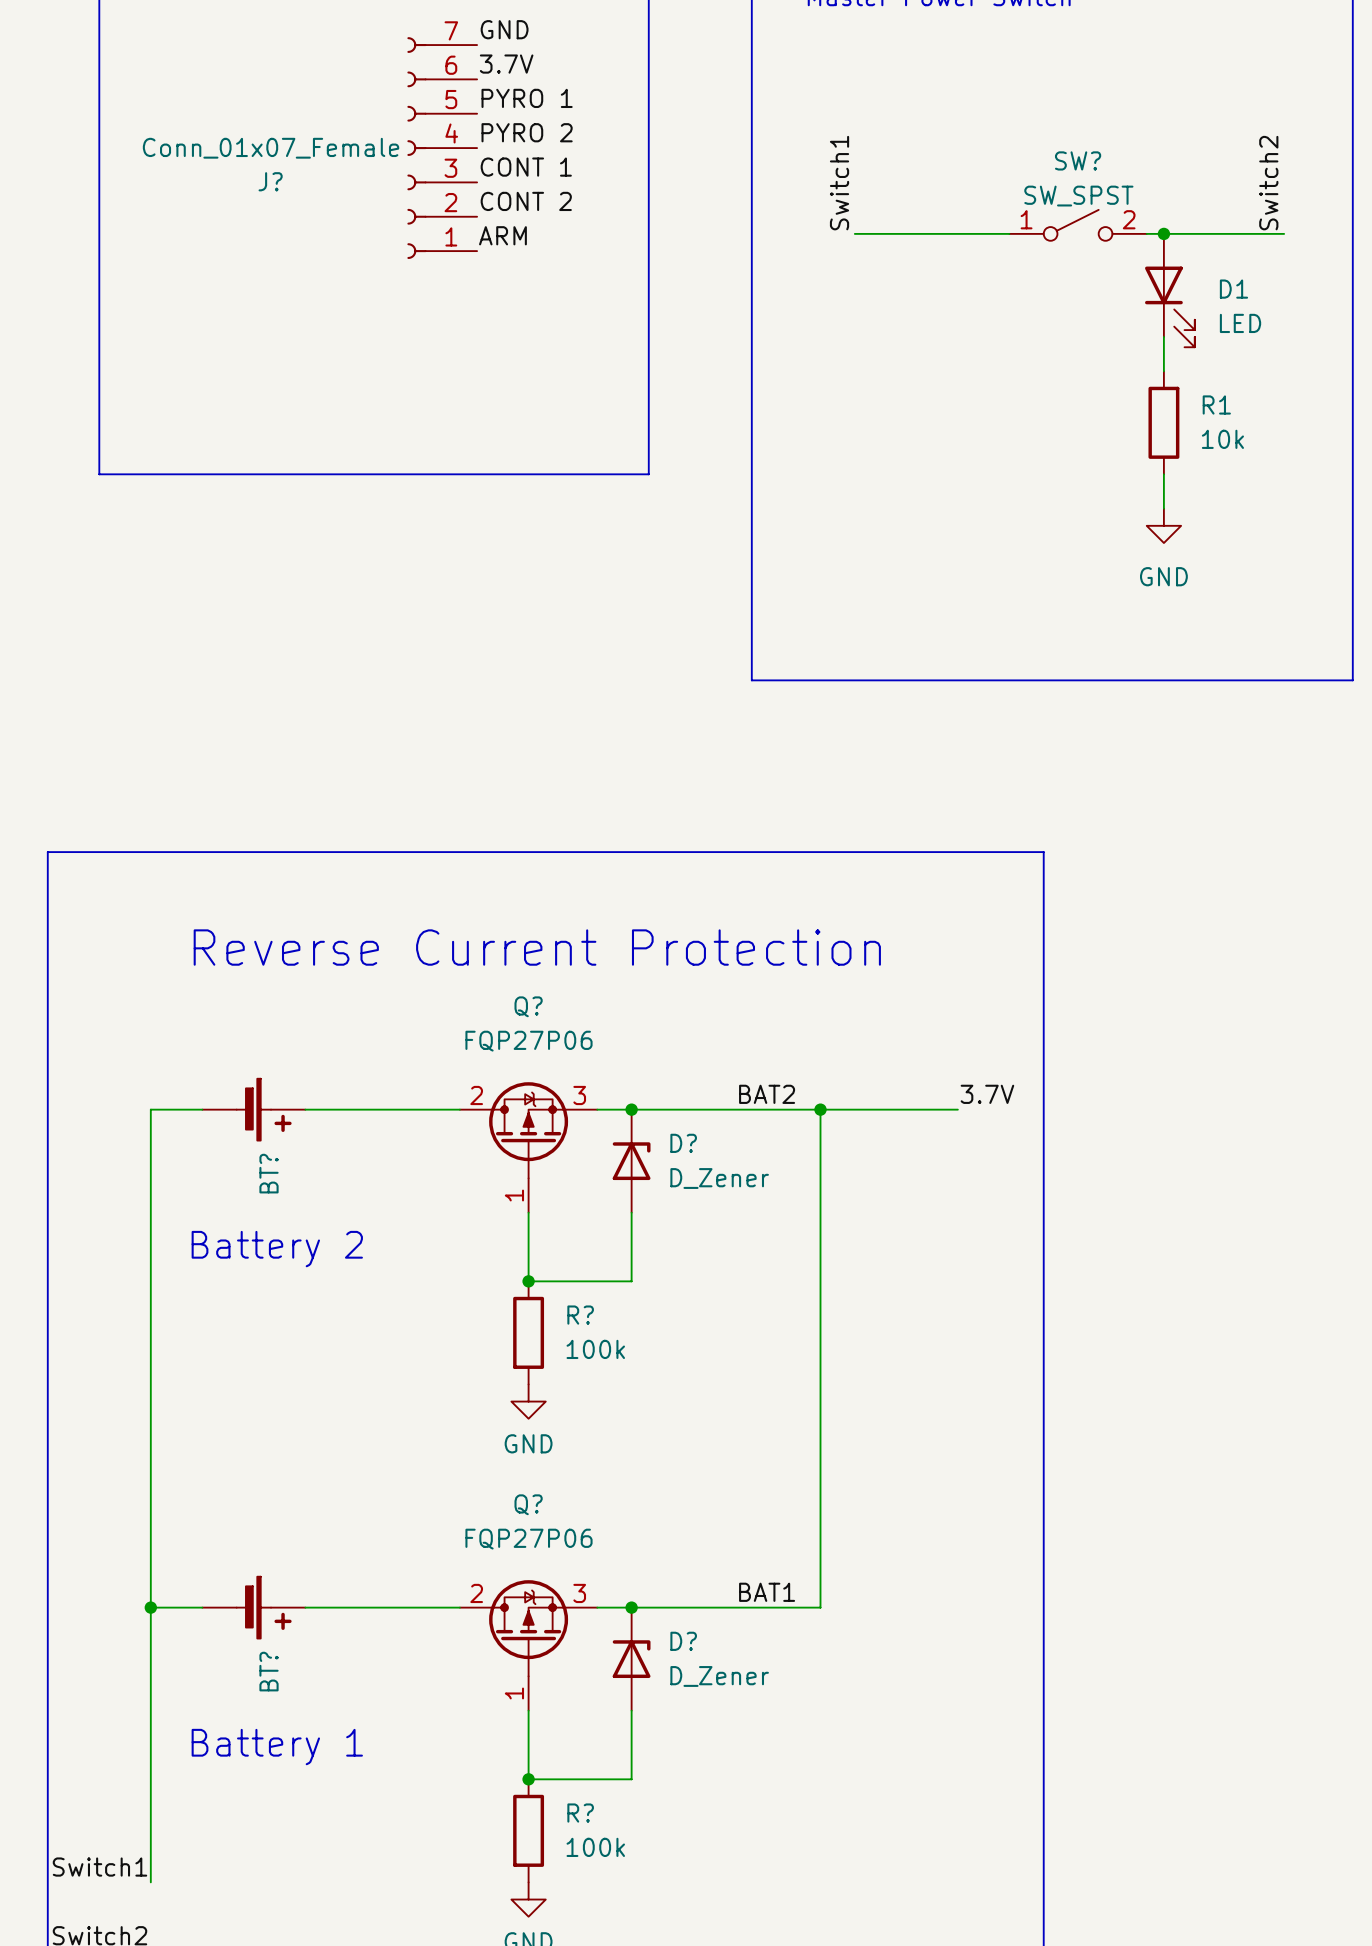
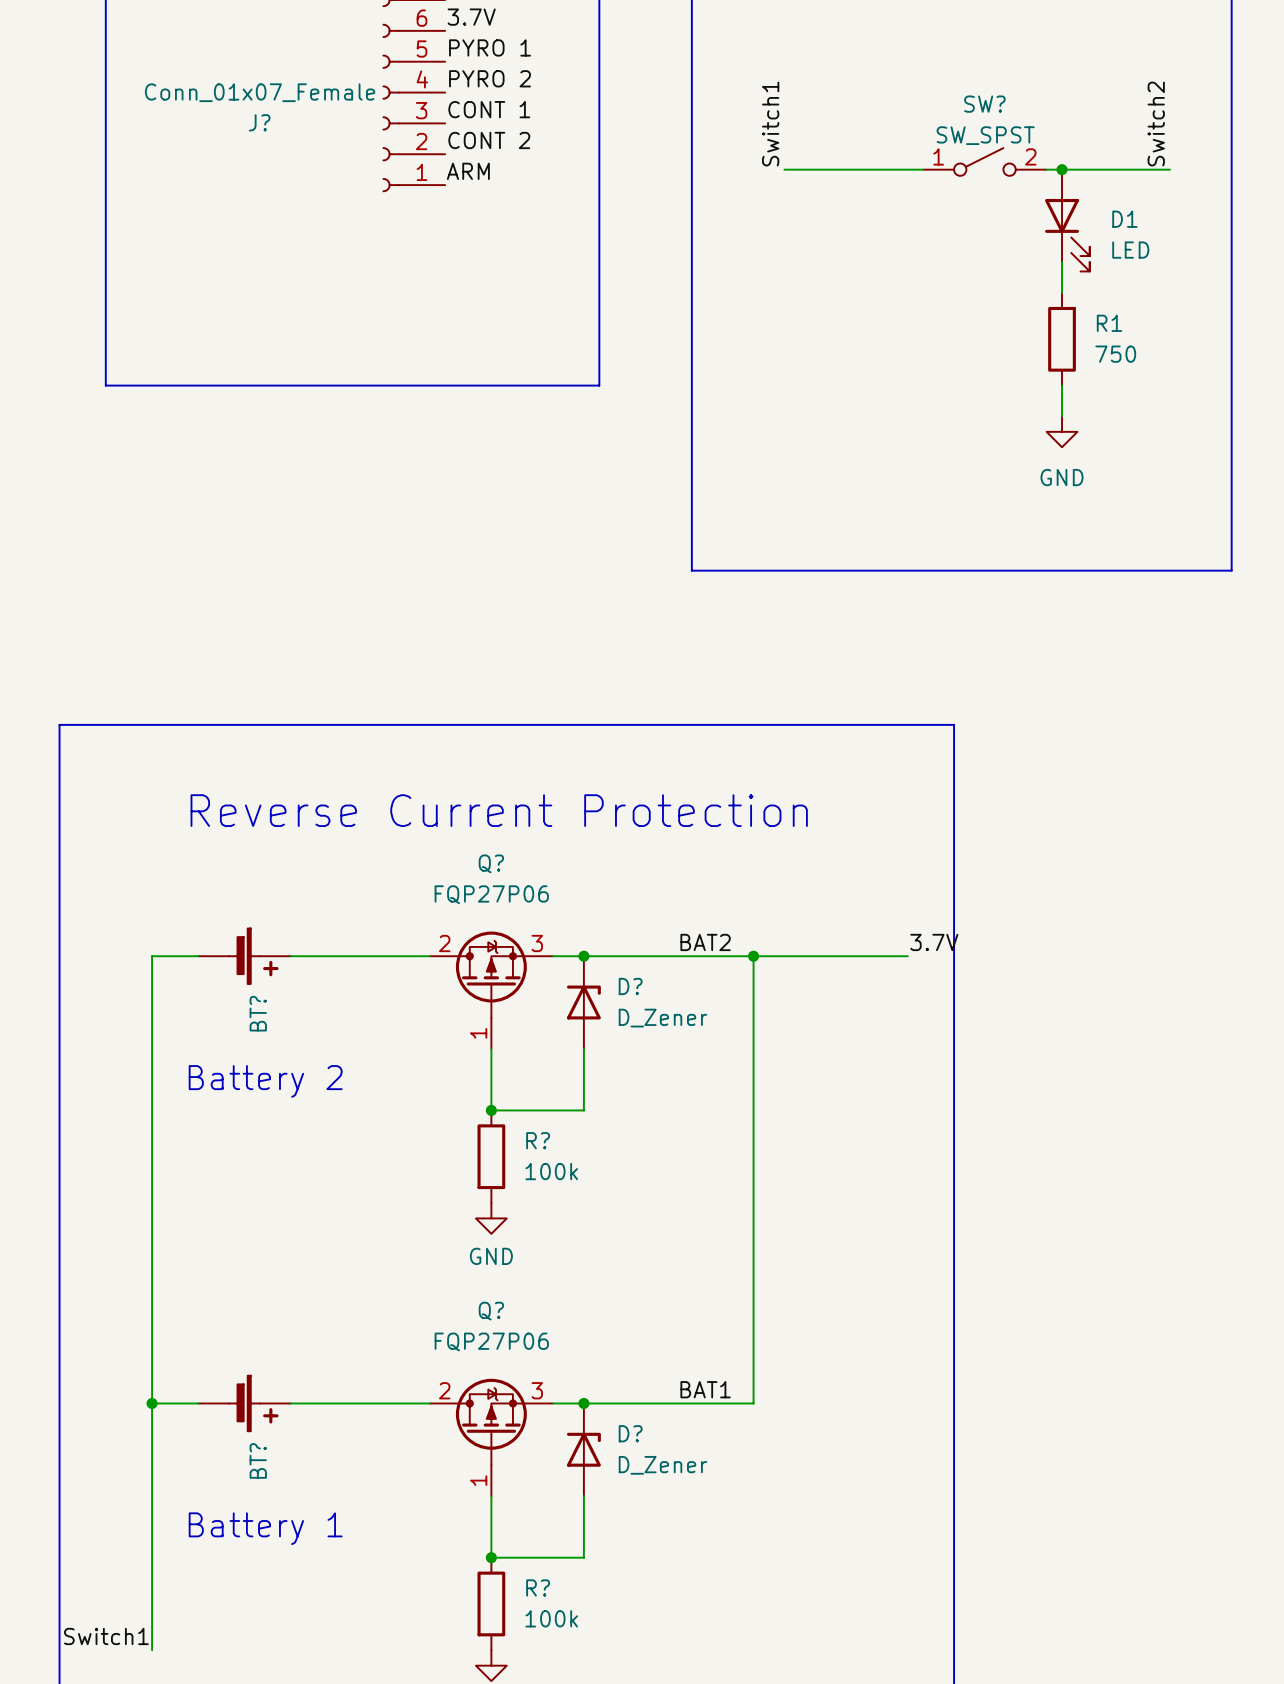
R1 value: 10k (1222, 439) -> 750 (1115, 354)
label position: 3.7V (987, 1094) -> 3.7V (934, 942)
wire: none -> (876, 956) (907, 956)

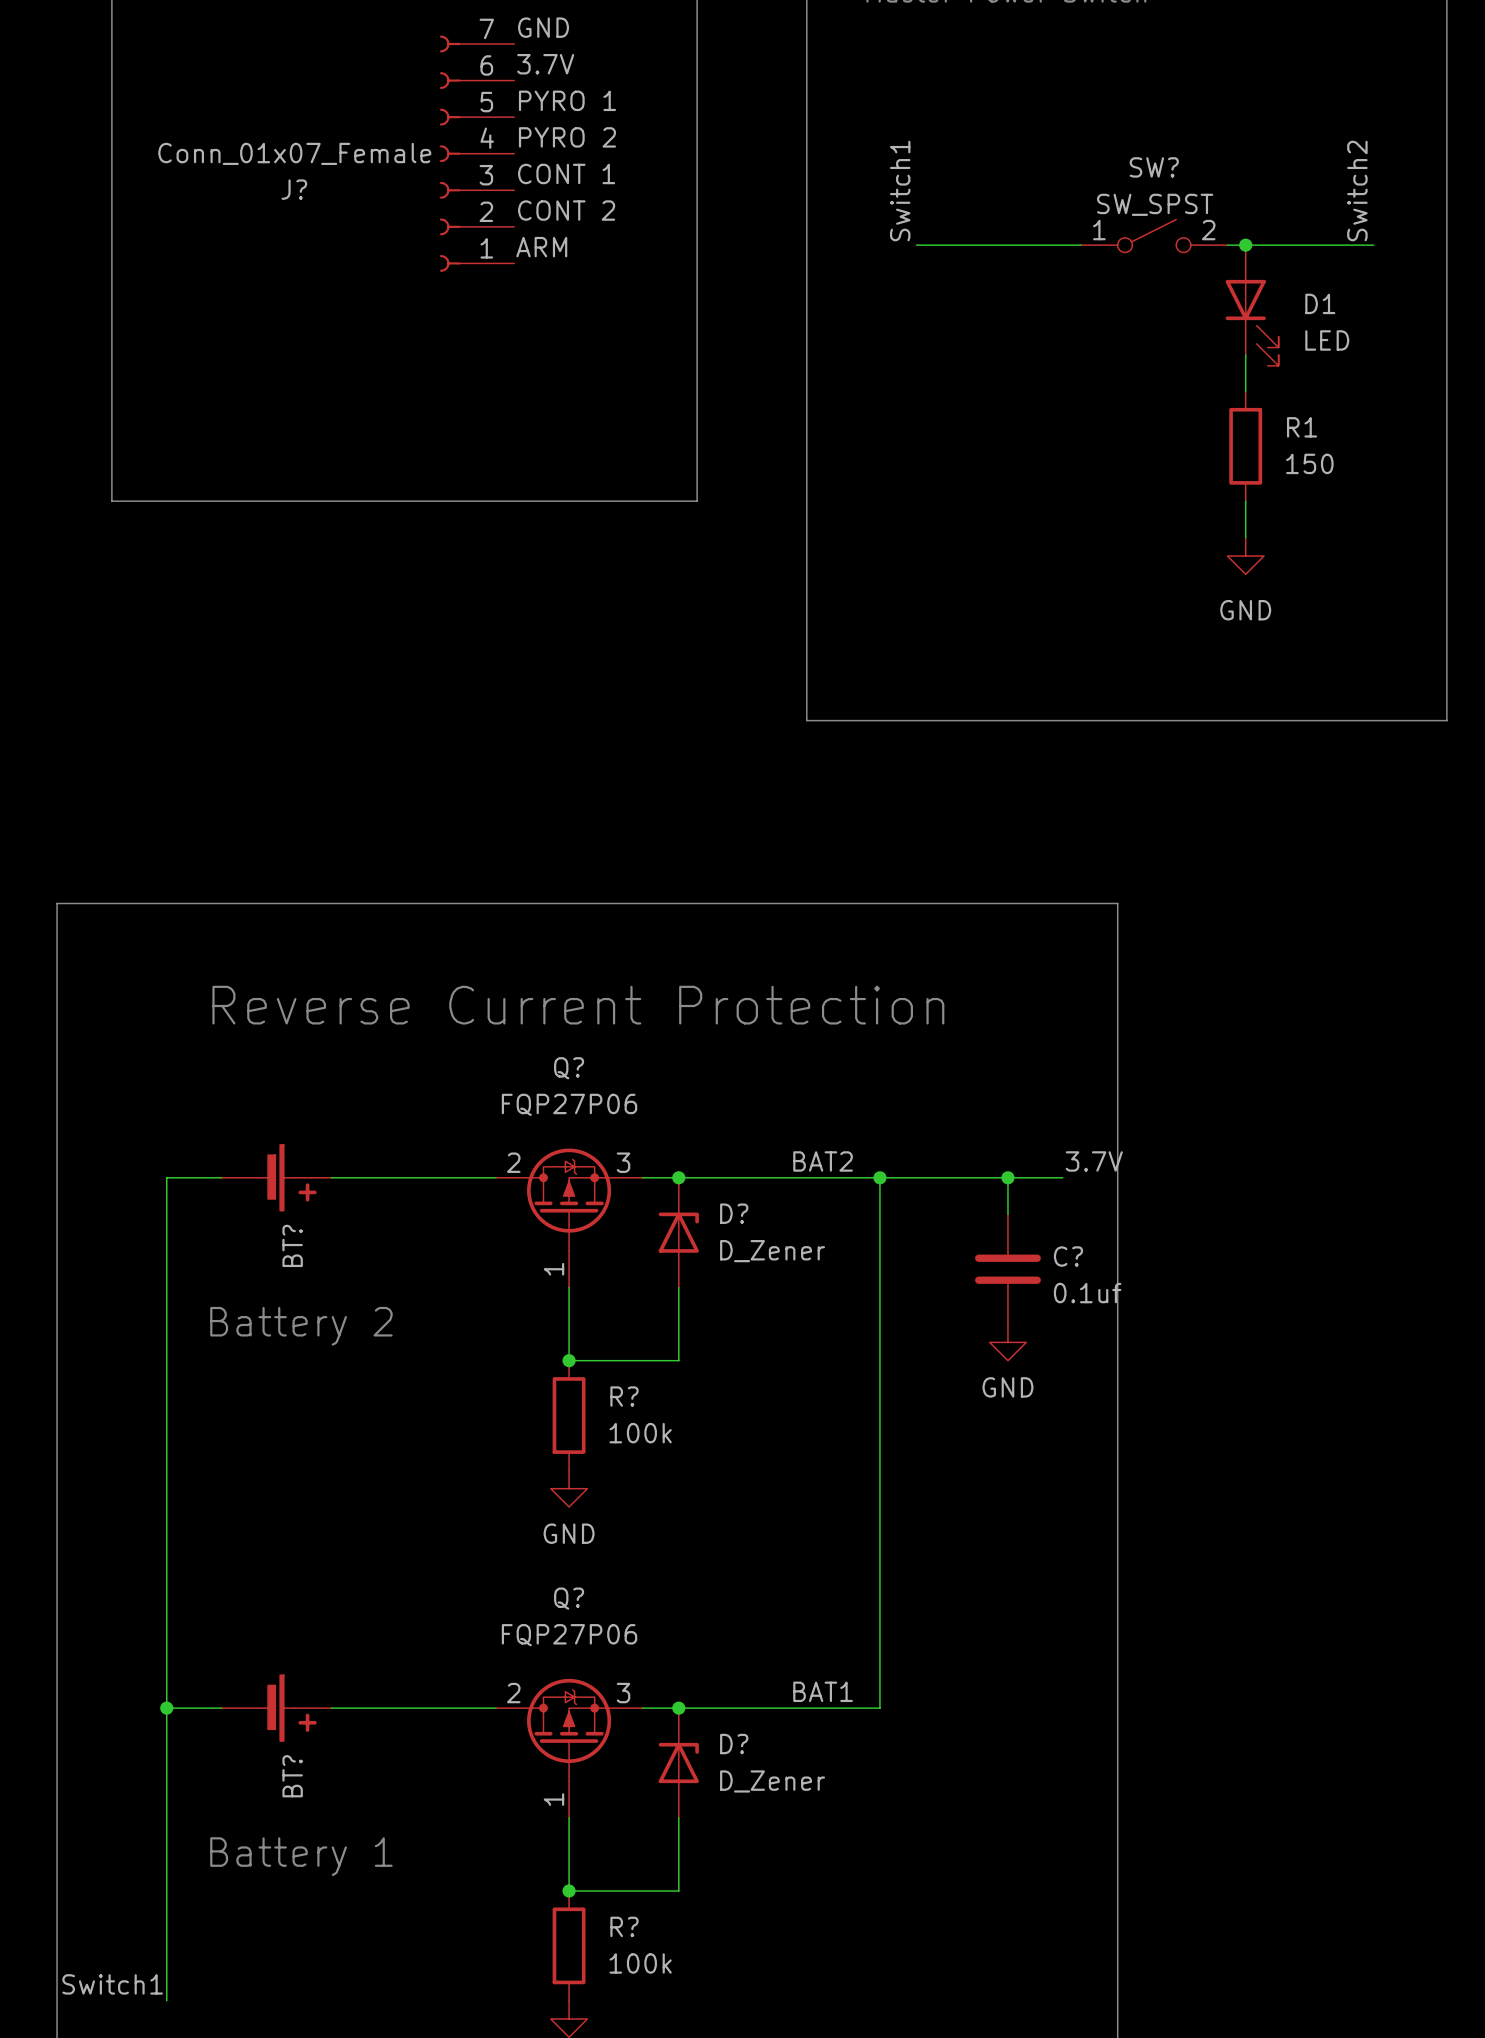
R1 value: 750 (1115, 354) -> 150 (1309, 463)
wire: none -> (1007, 1177) (1007, 1214)
junction: none -> (1007, 1177)
C?: none -> 0.1uf (1007, 1269)
power symbol: none -> GND (1007, 1342)

